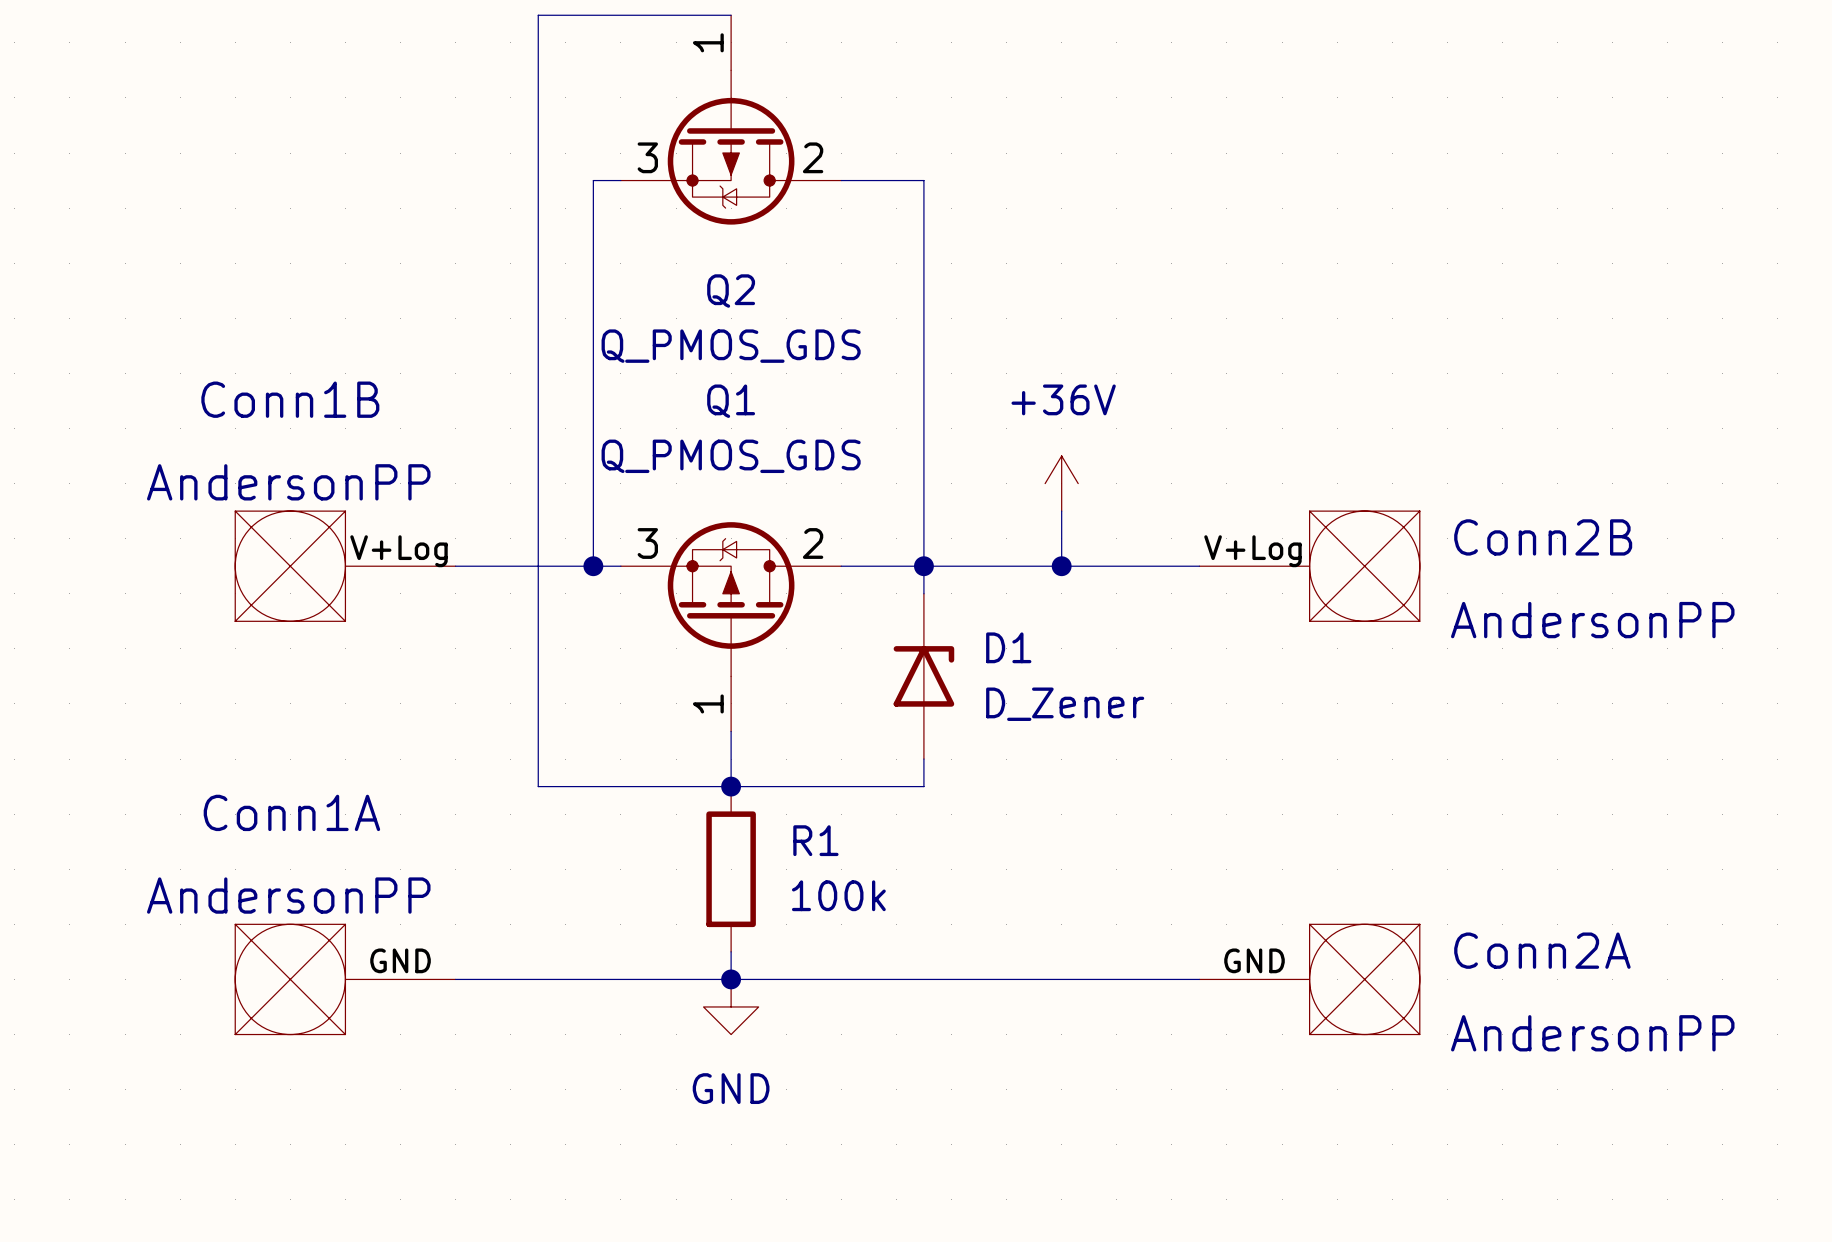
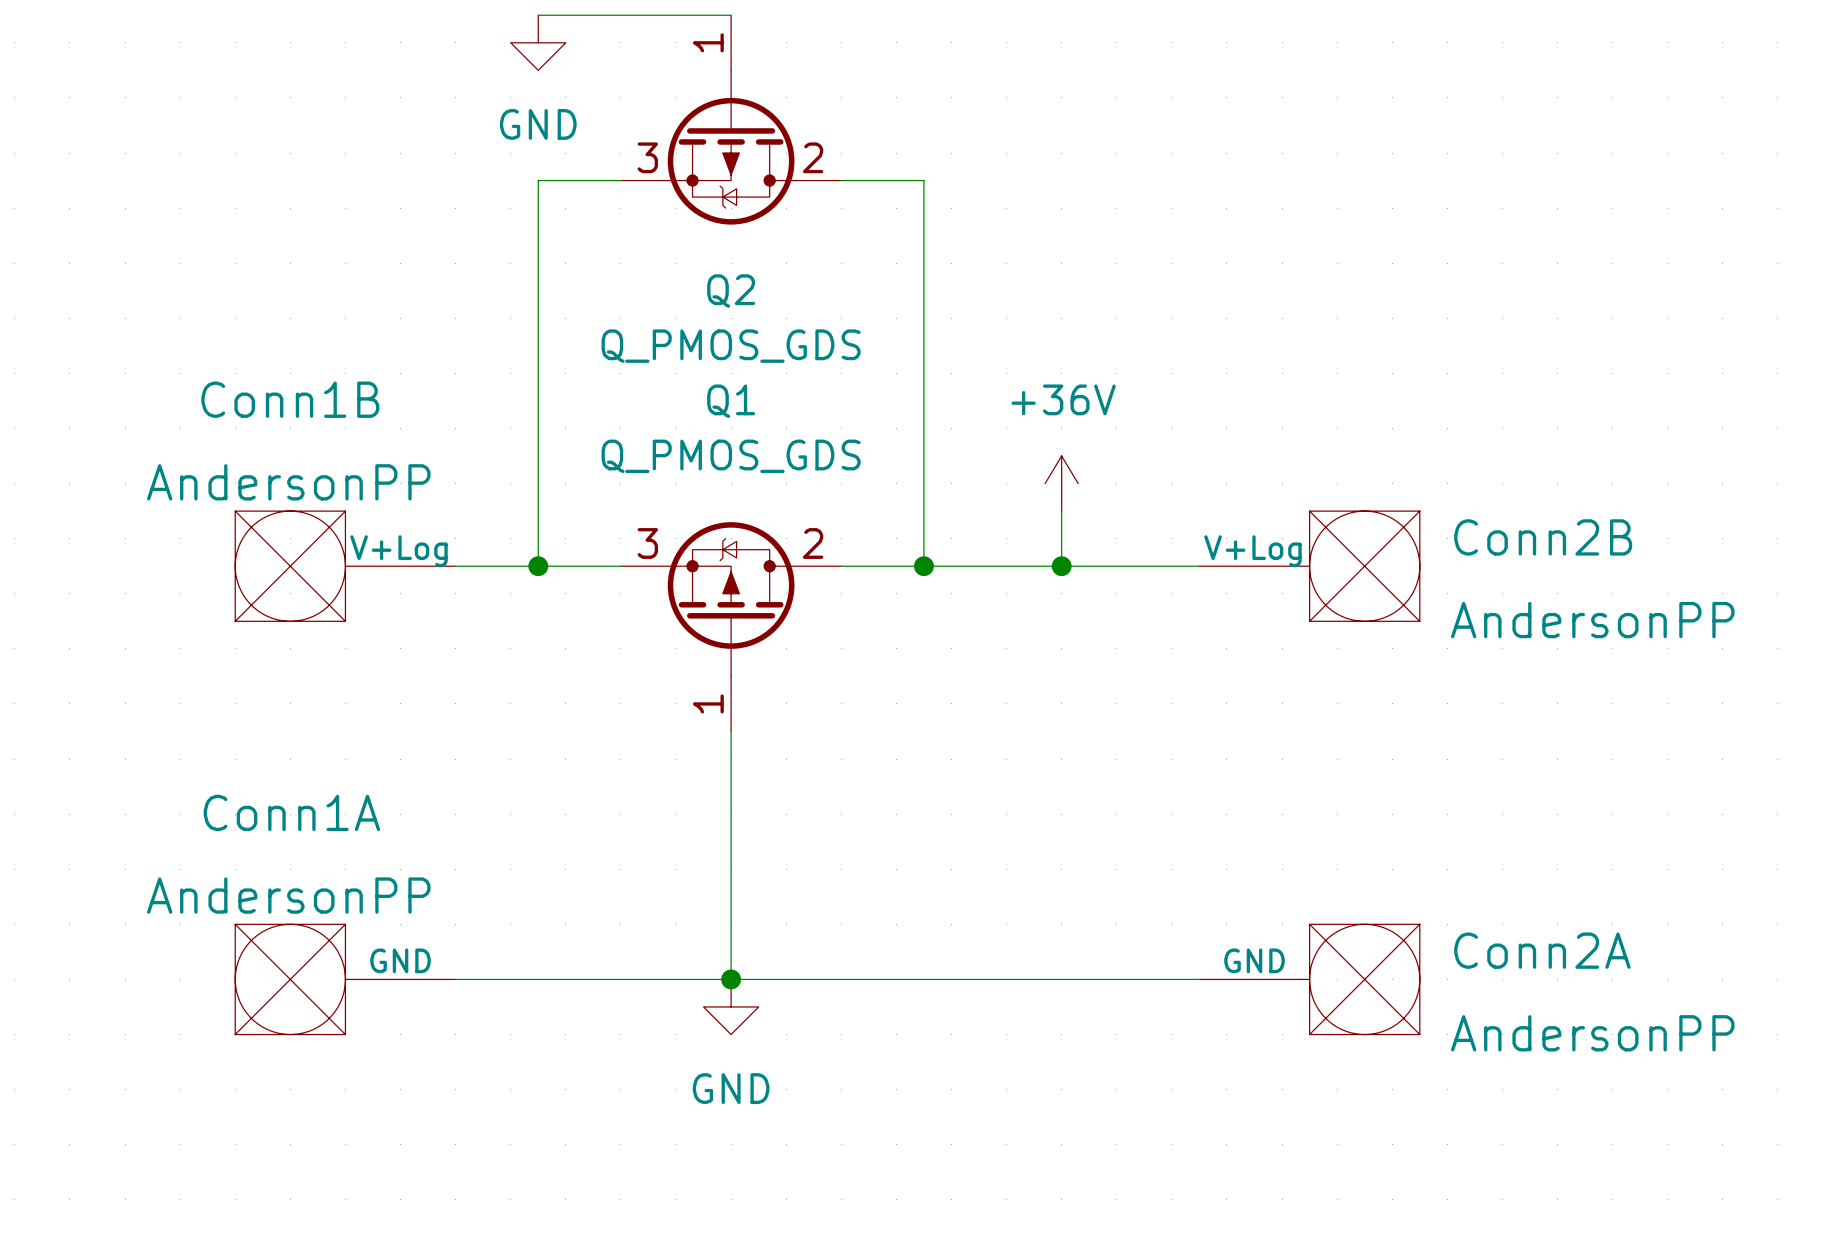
wire: (538, 15) (538, 180) -> (593, 180) (538, 180)
power symbol: none -> GND (538, 42)
wire: (593, 180) (593, 566) -> none
wire: (538, 566) (538, 786) (923, 786) (923, 759) -> none
junction position: (593, 566) -> (538, 566)
wire: (923, 566) (923, 593) -> none
D1: D_Zener (923, 676) -> none
wire: none -> (731, 786) (731, 951)
junction: (731, 786) -> none
R1: 100k (731, 869) -> none

